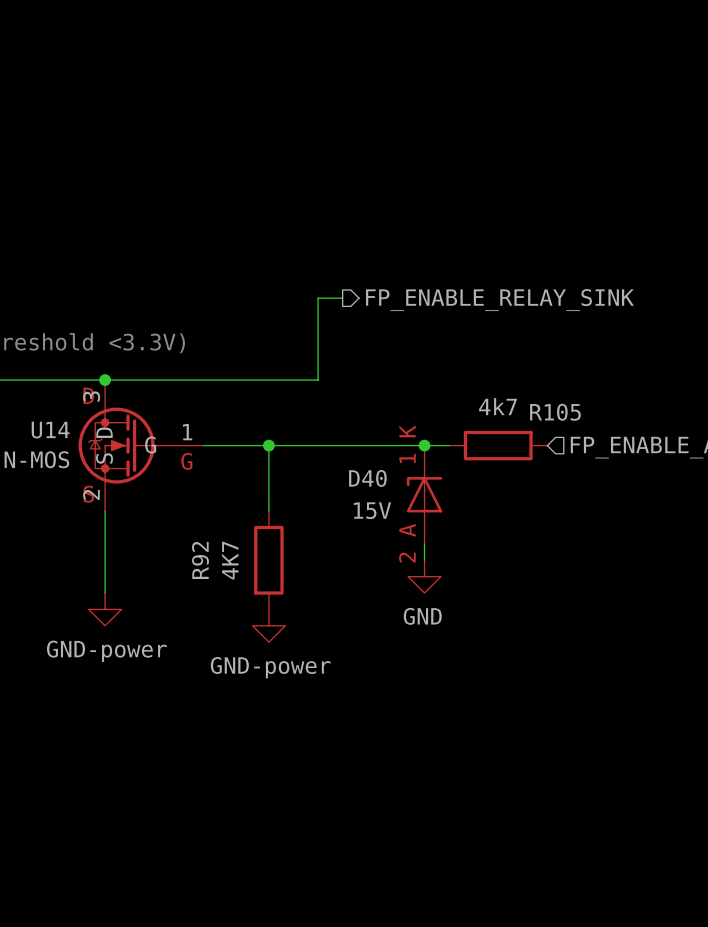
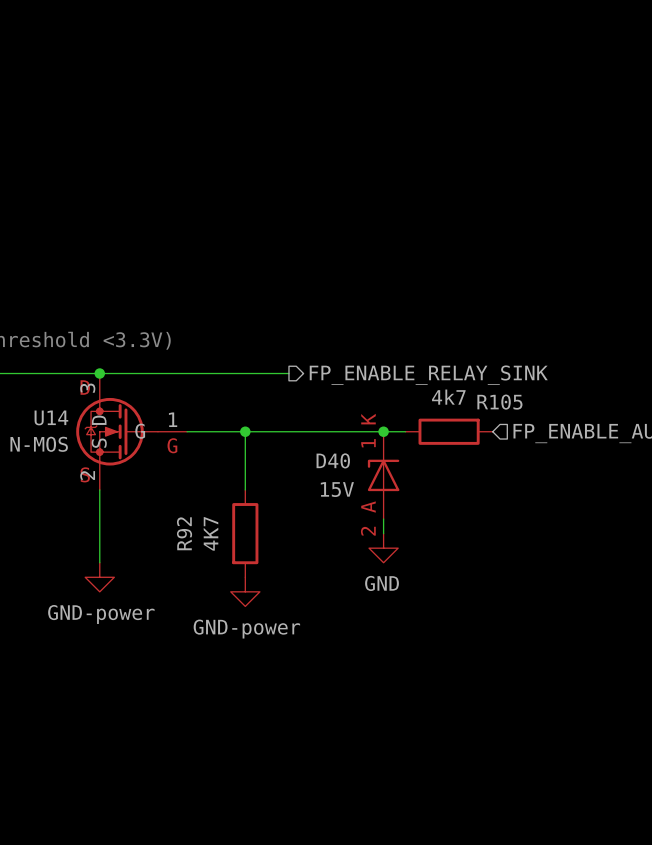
wire: (342, 298) (318, 298) (318, 380) -> none
hierarchical label position: FP_ENABLE_RELAY_SINK (499, 300) -> FP_ENABLE_RELAY_SINK (428, 375)

